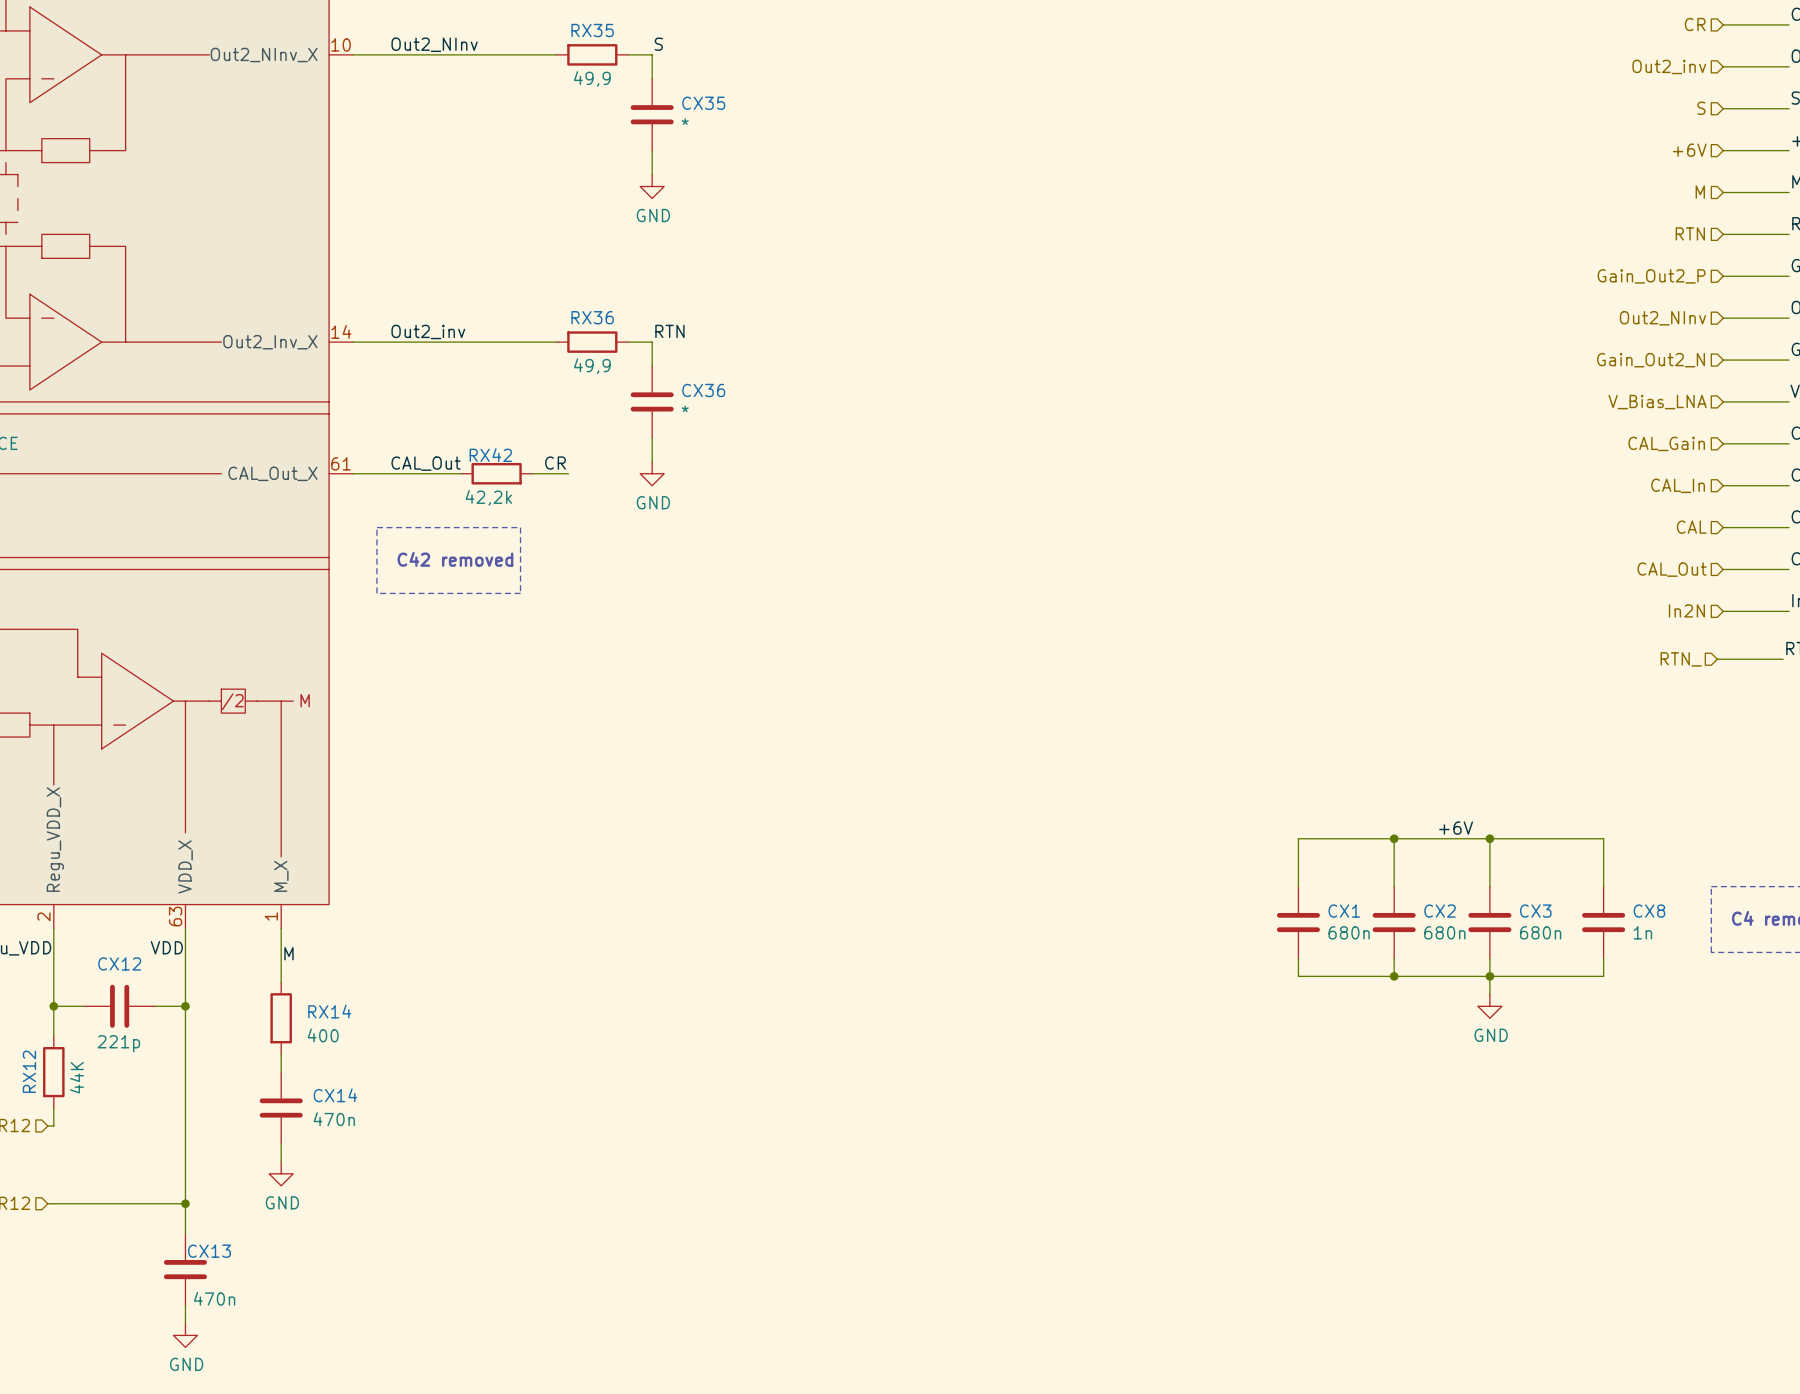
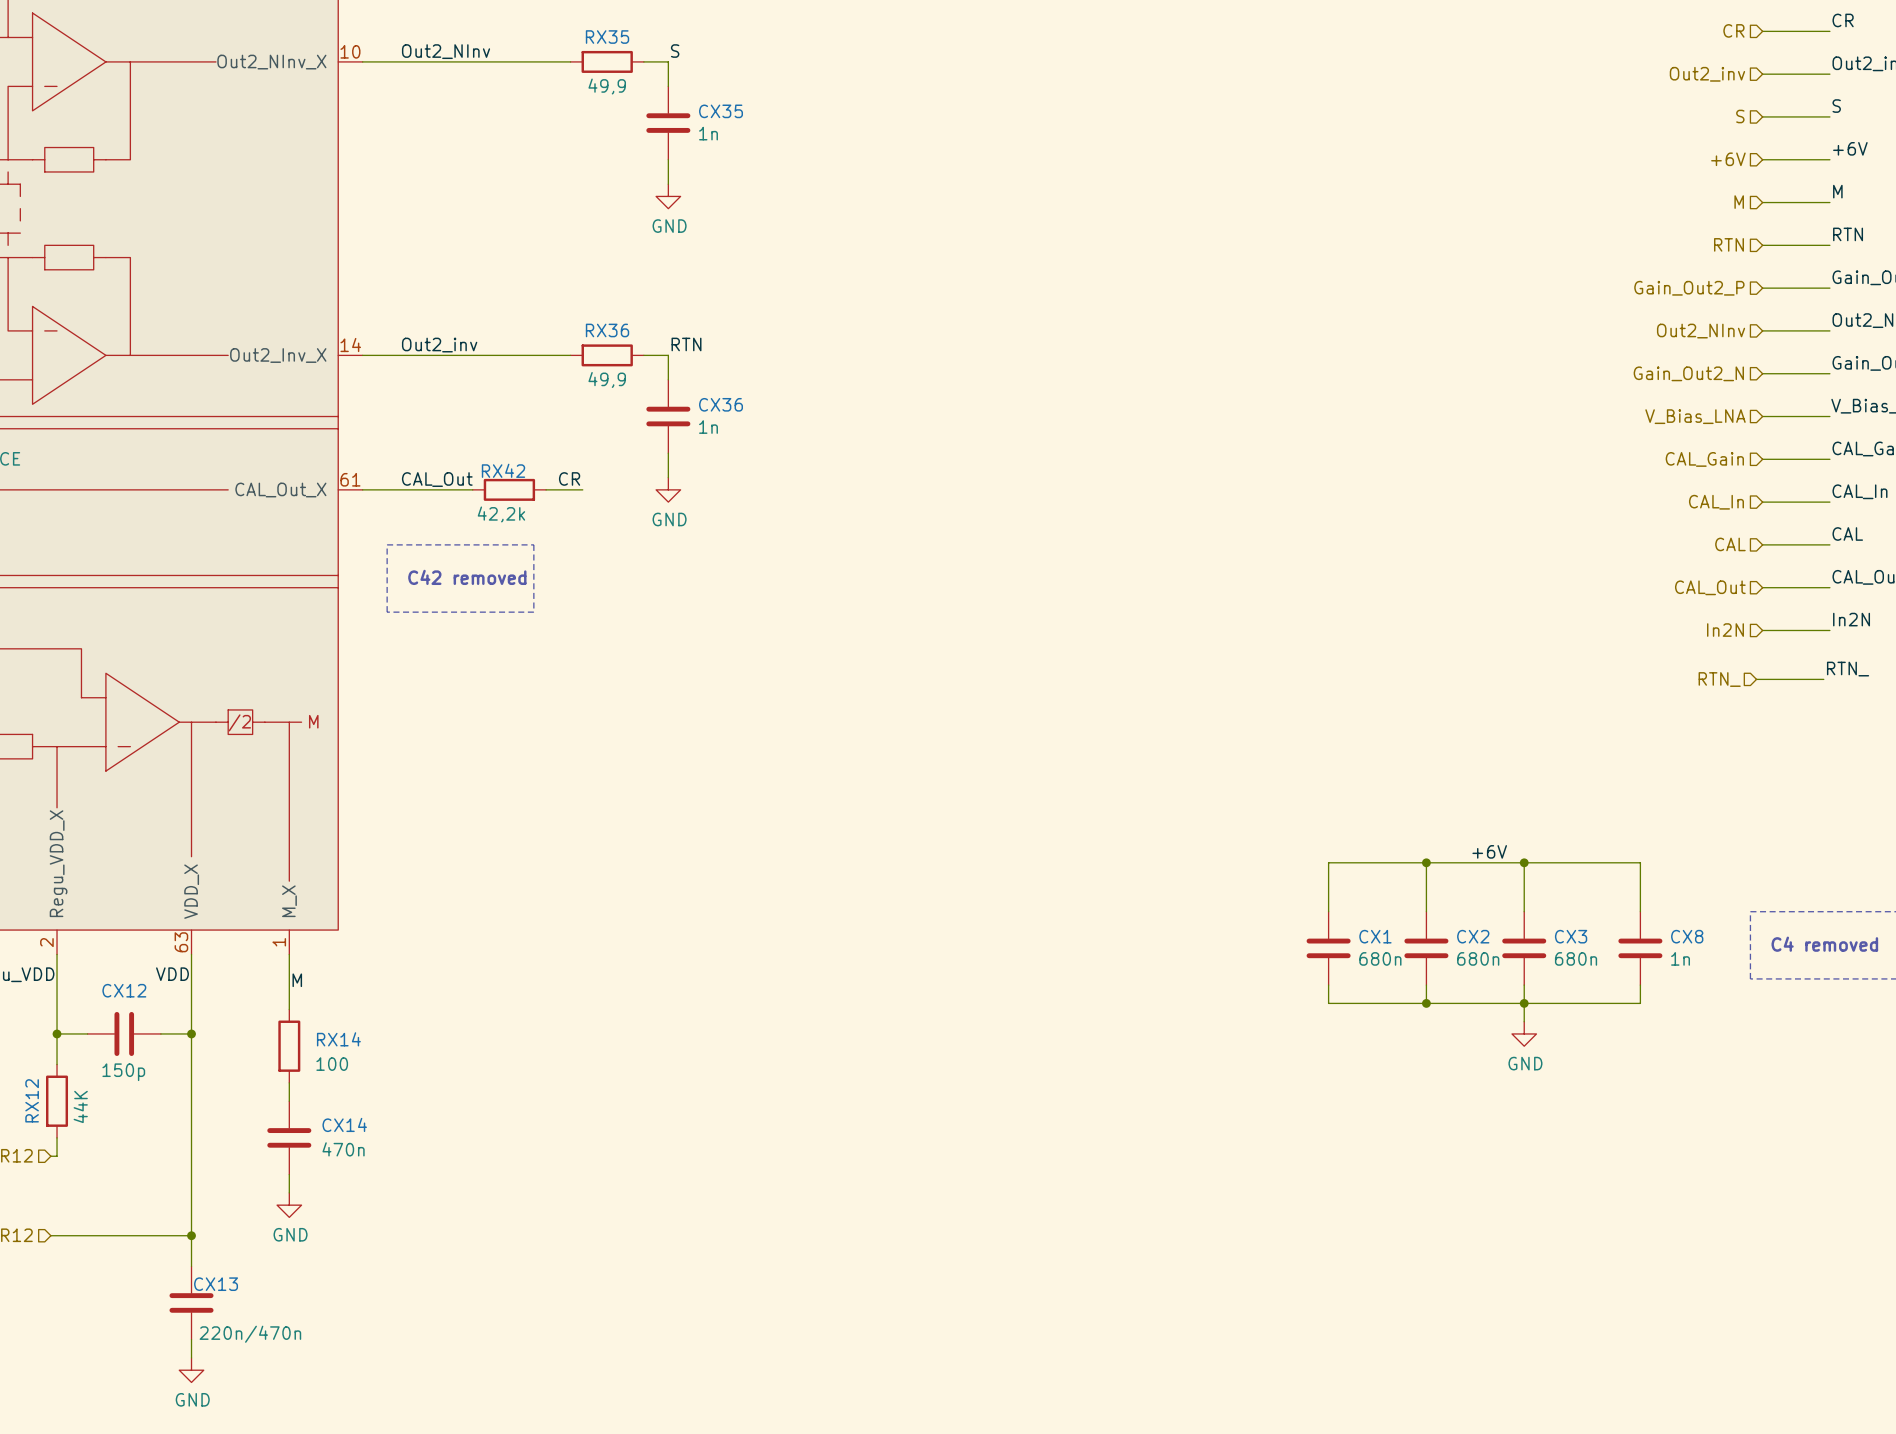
CX35 value: * (685, 121) -> 1n (708, 133)
CX36 value: * (685, 408) -> 1n (708, 427)
RX14 value: 400 (323, 1035) -> 100 (332, 1064)
CX12 value: 221p (118, 1043) -> 150p (123, 1072)
CX13 value: 470n (214, 1298) -> 220n/470n (250, 1334)

